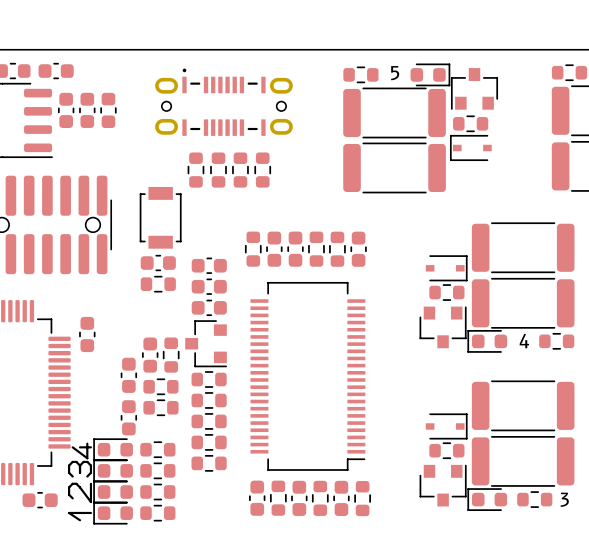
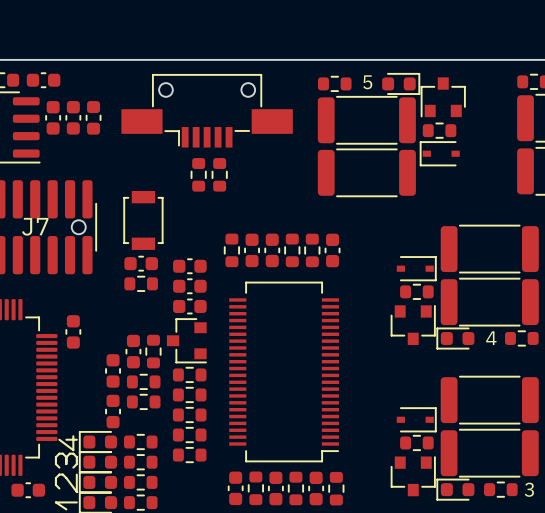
part footprint: [155, 68, 293, 136] -> [121, 74, 293, 148]
part: (195, 170) -> none
part: (262, 170) -> none
J7 name: none -> J7 (35, 226)

